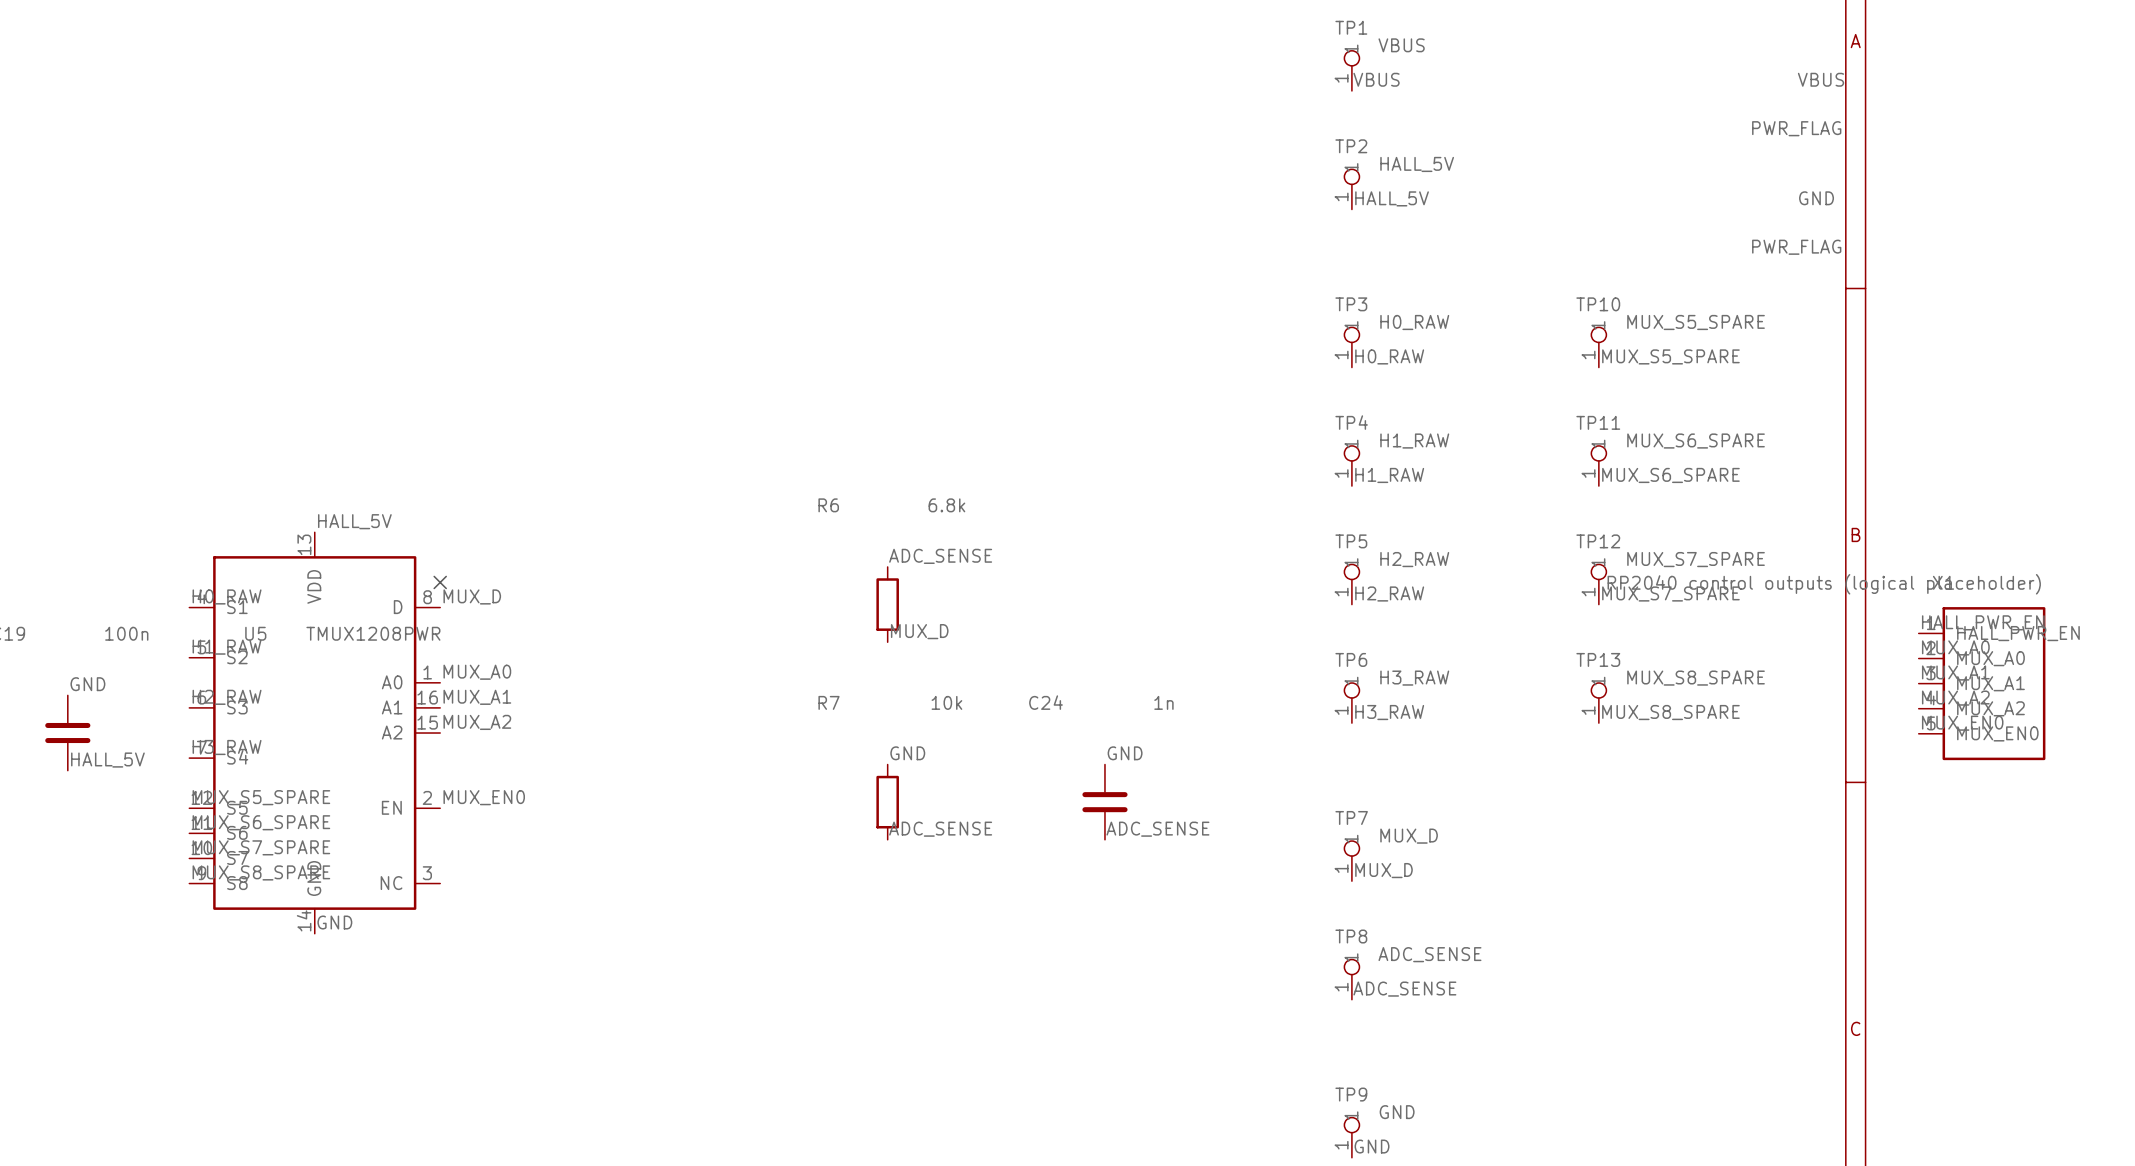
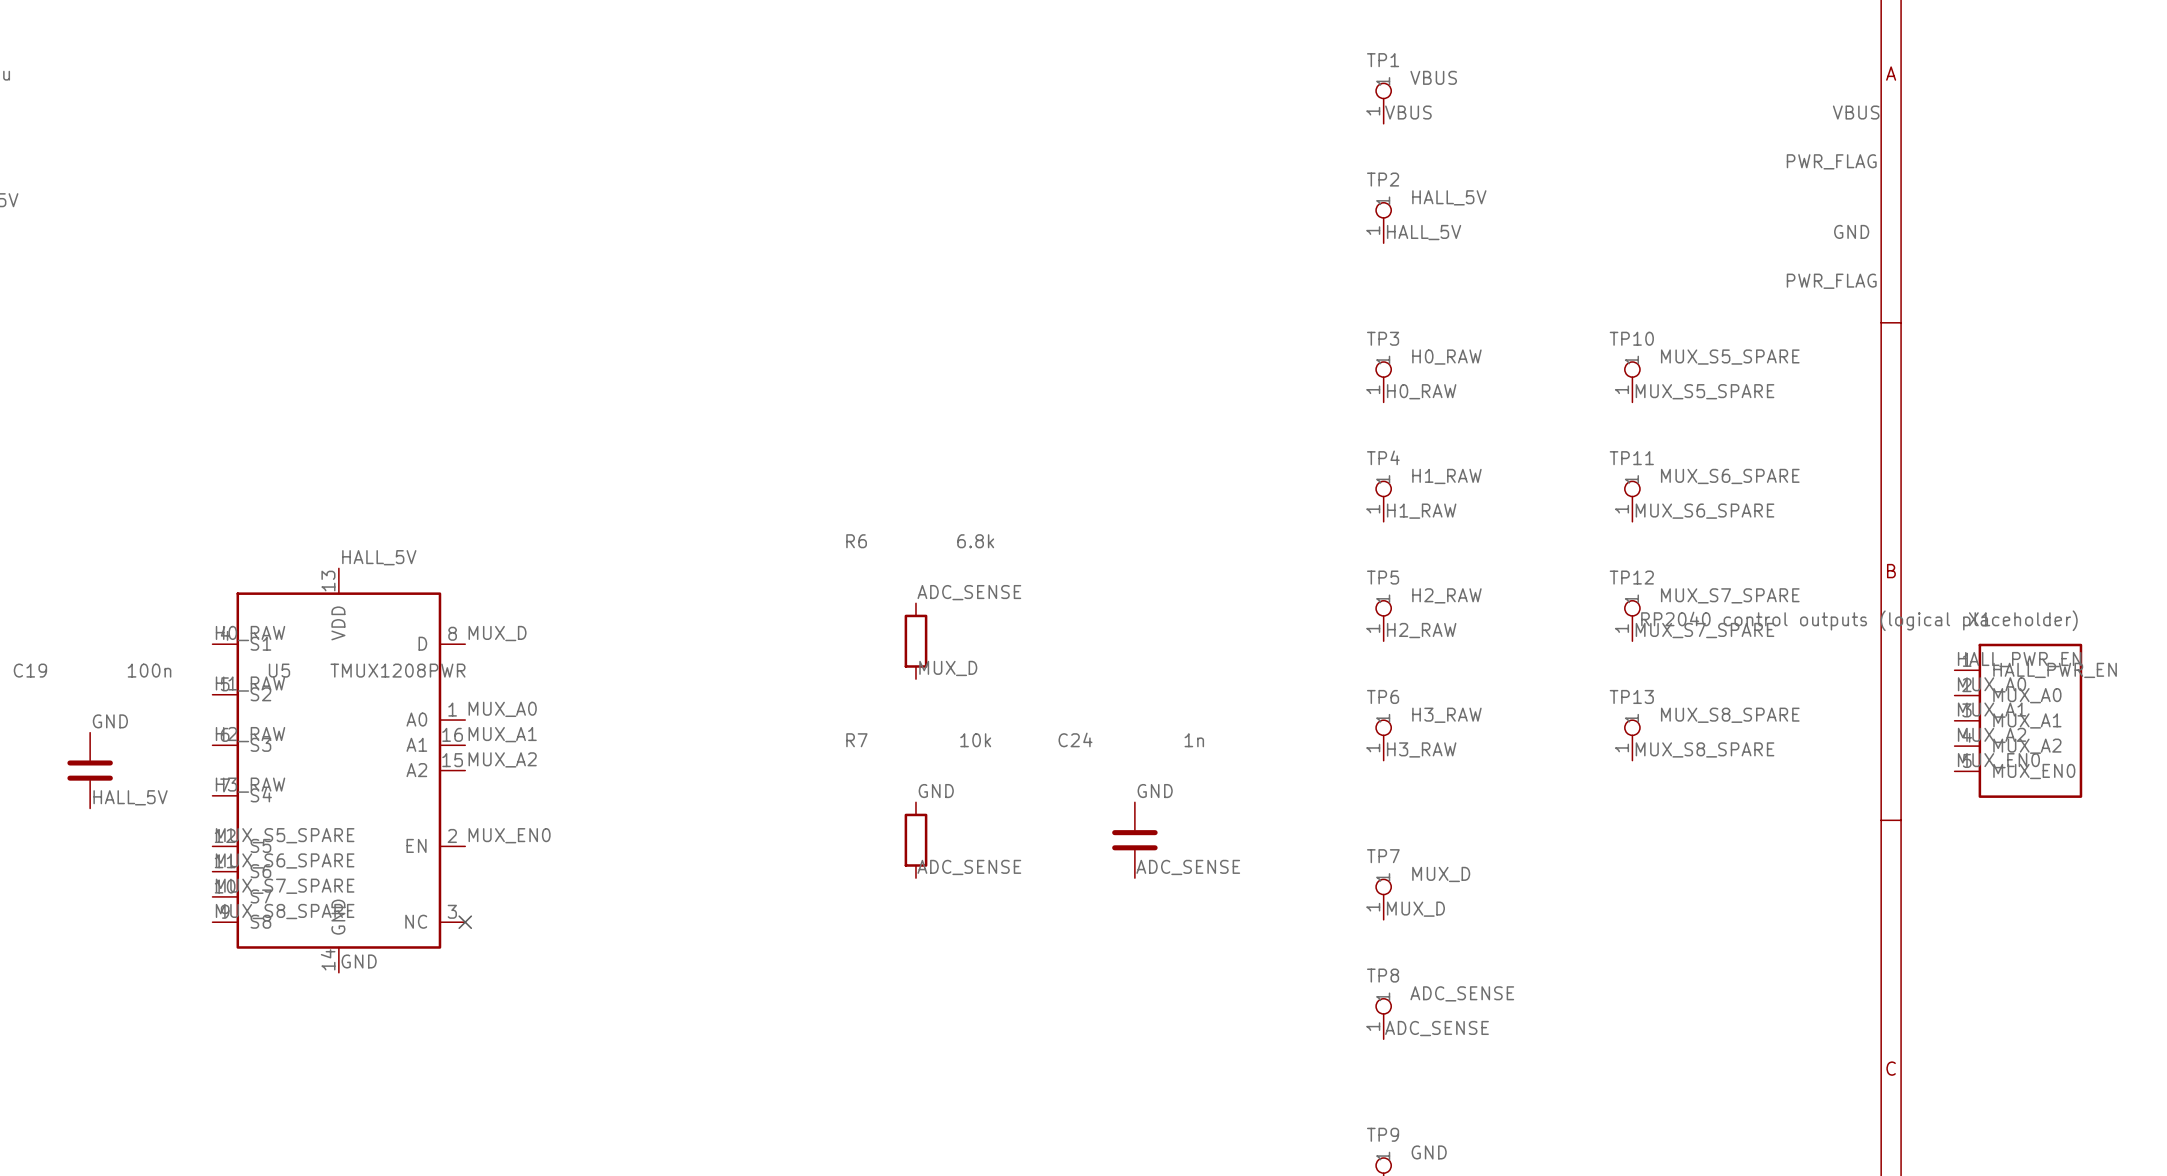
no-connect mark: (440, 582) -> none
no-connect mark: none -> (465, 922)

